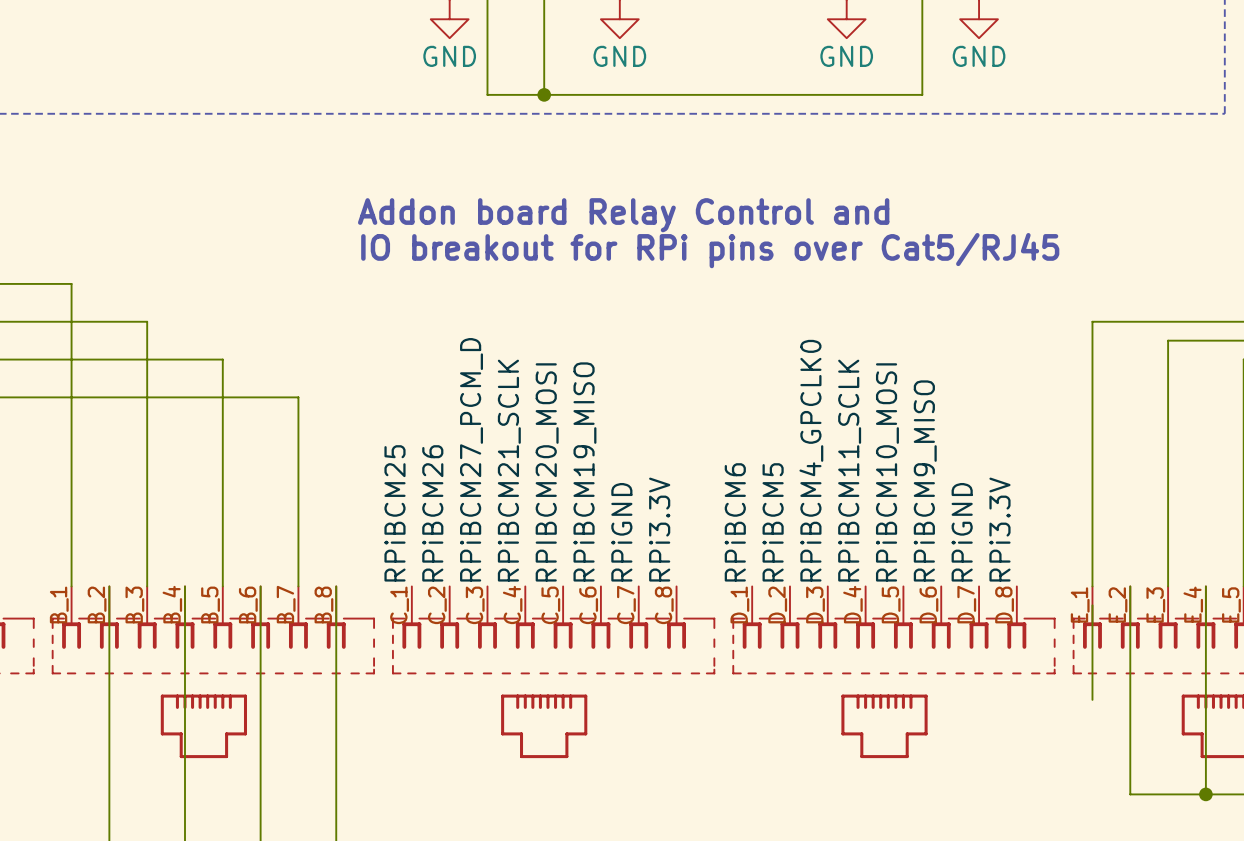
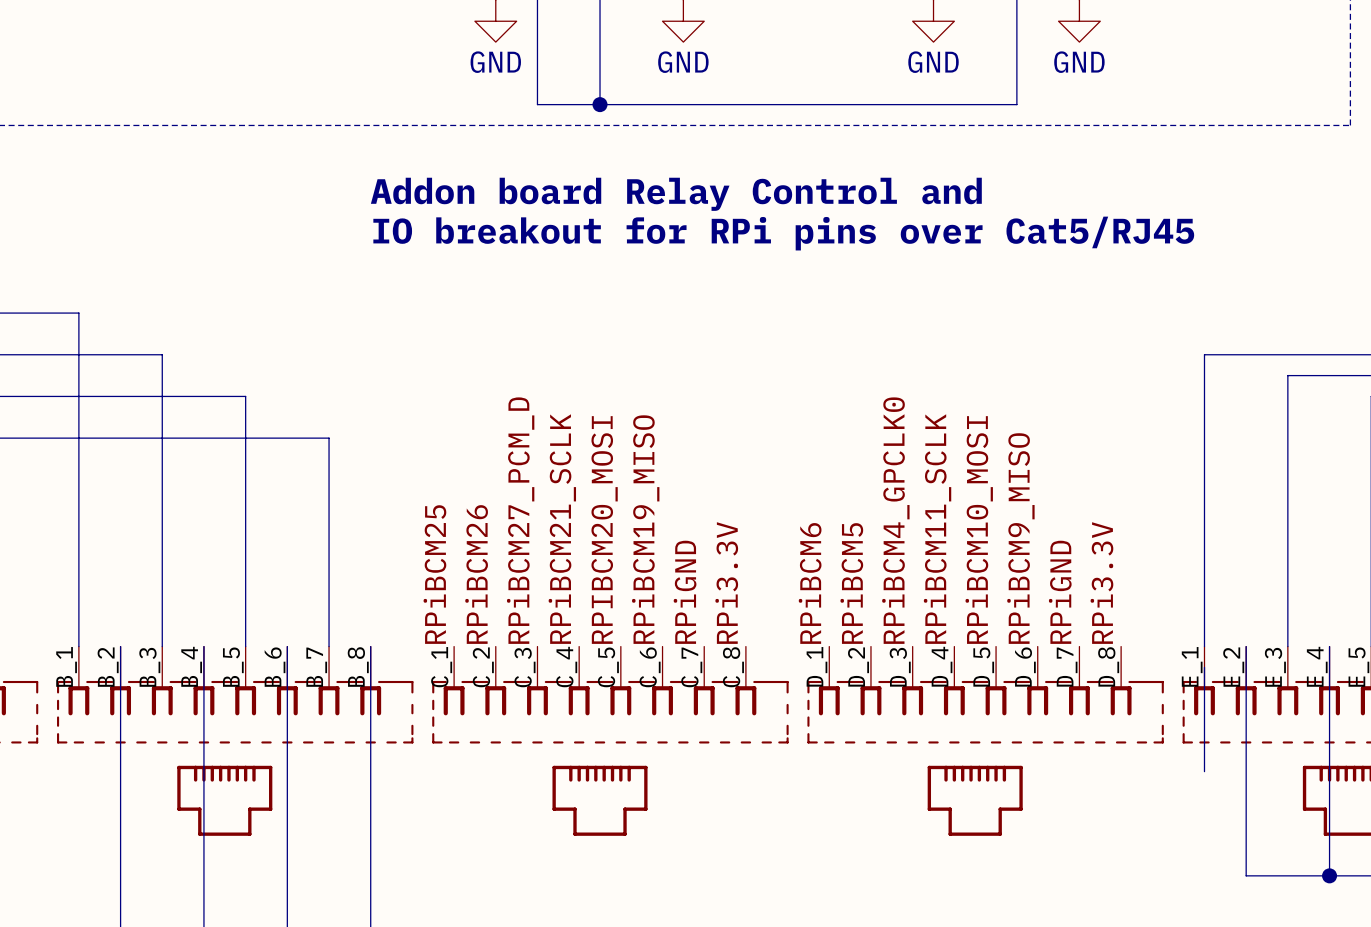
text position: Addon board Relay Control and (623, 215) -> Addon board Relay Control and (676, 194)
text position: IO breakout for RPi pins over Cat5/RJ45 (710, 250) -> IO breakout for RPi pins over Cat5/RJ45 (783, 233)

